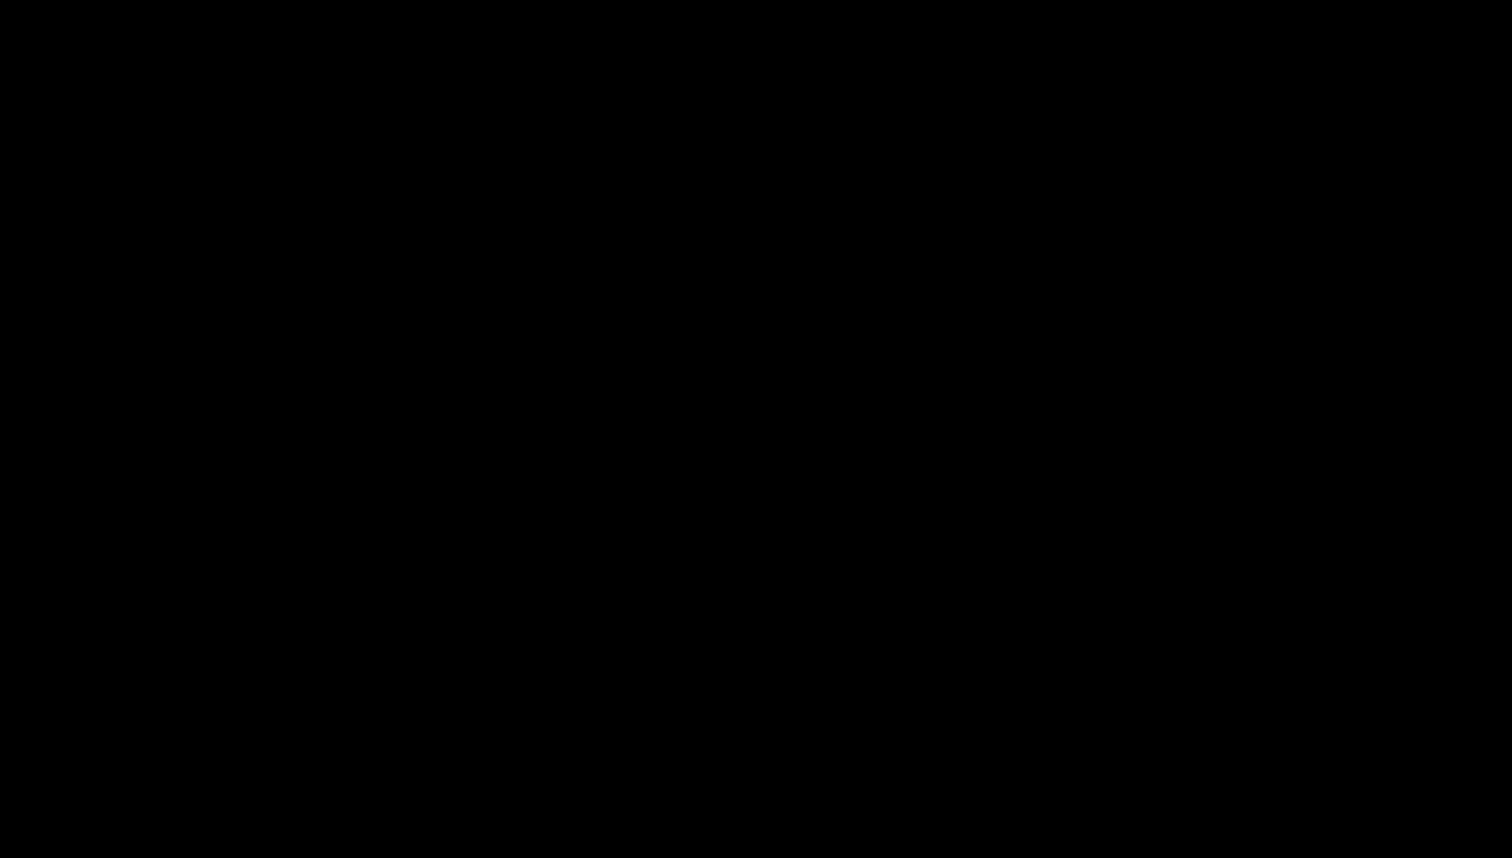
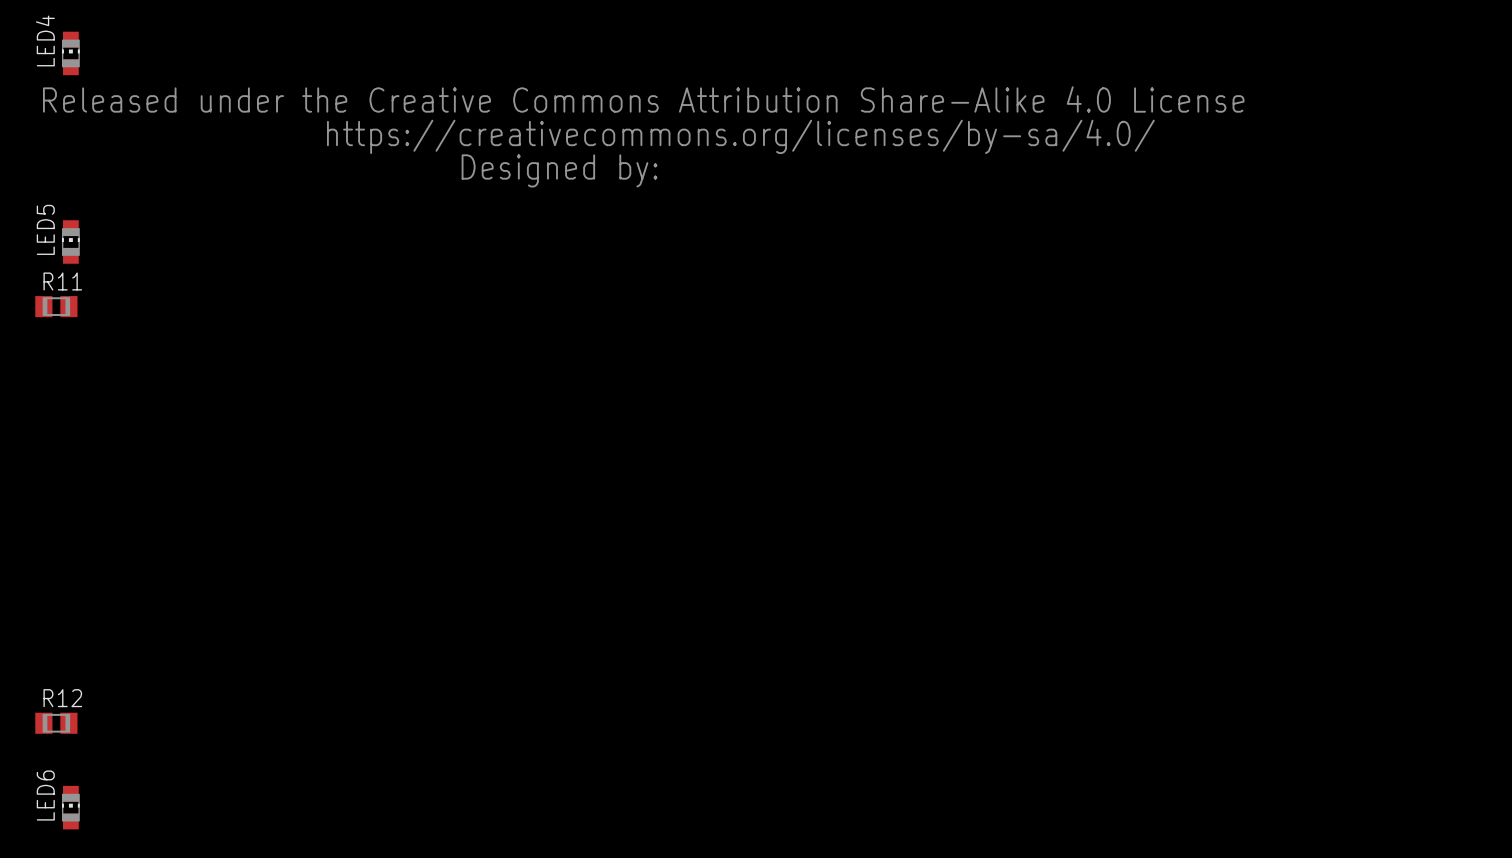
LED4: none -> (70, 53)
drawing: none -> [42, 86, 1245, 188]
LED5: none -> (70, 242)
R11: none -> (56, 306)
R12: none -> (56, 723)
LED6: none -> (70, 807)

